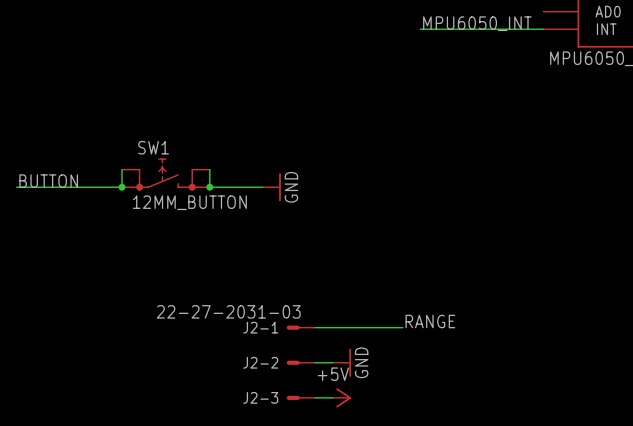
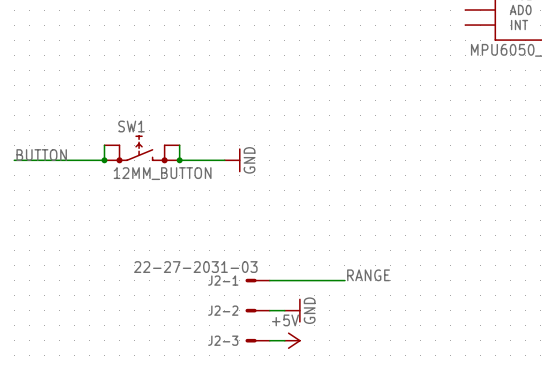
label: MPU6050_INT (477, 23) -> none
wire: (420, 29) (543, 29) -> none

